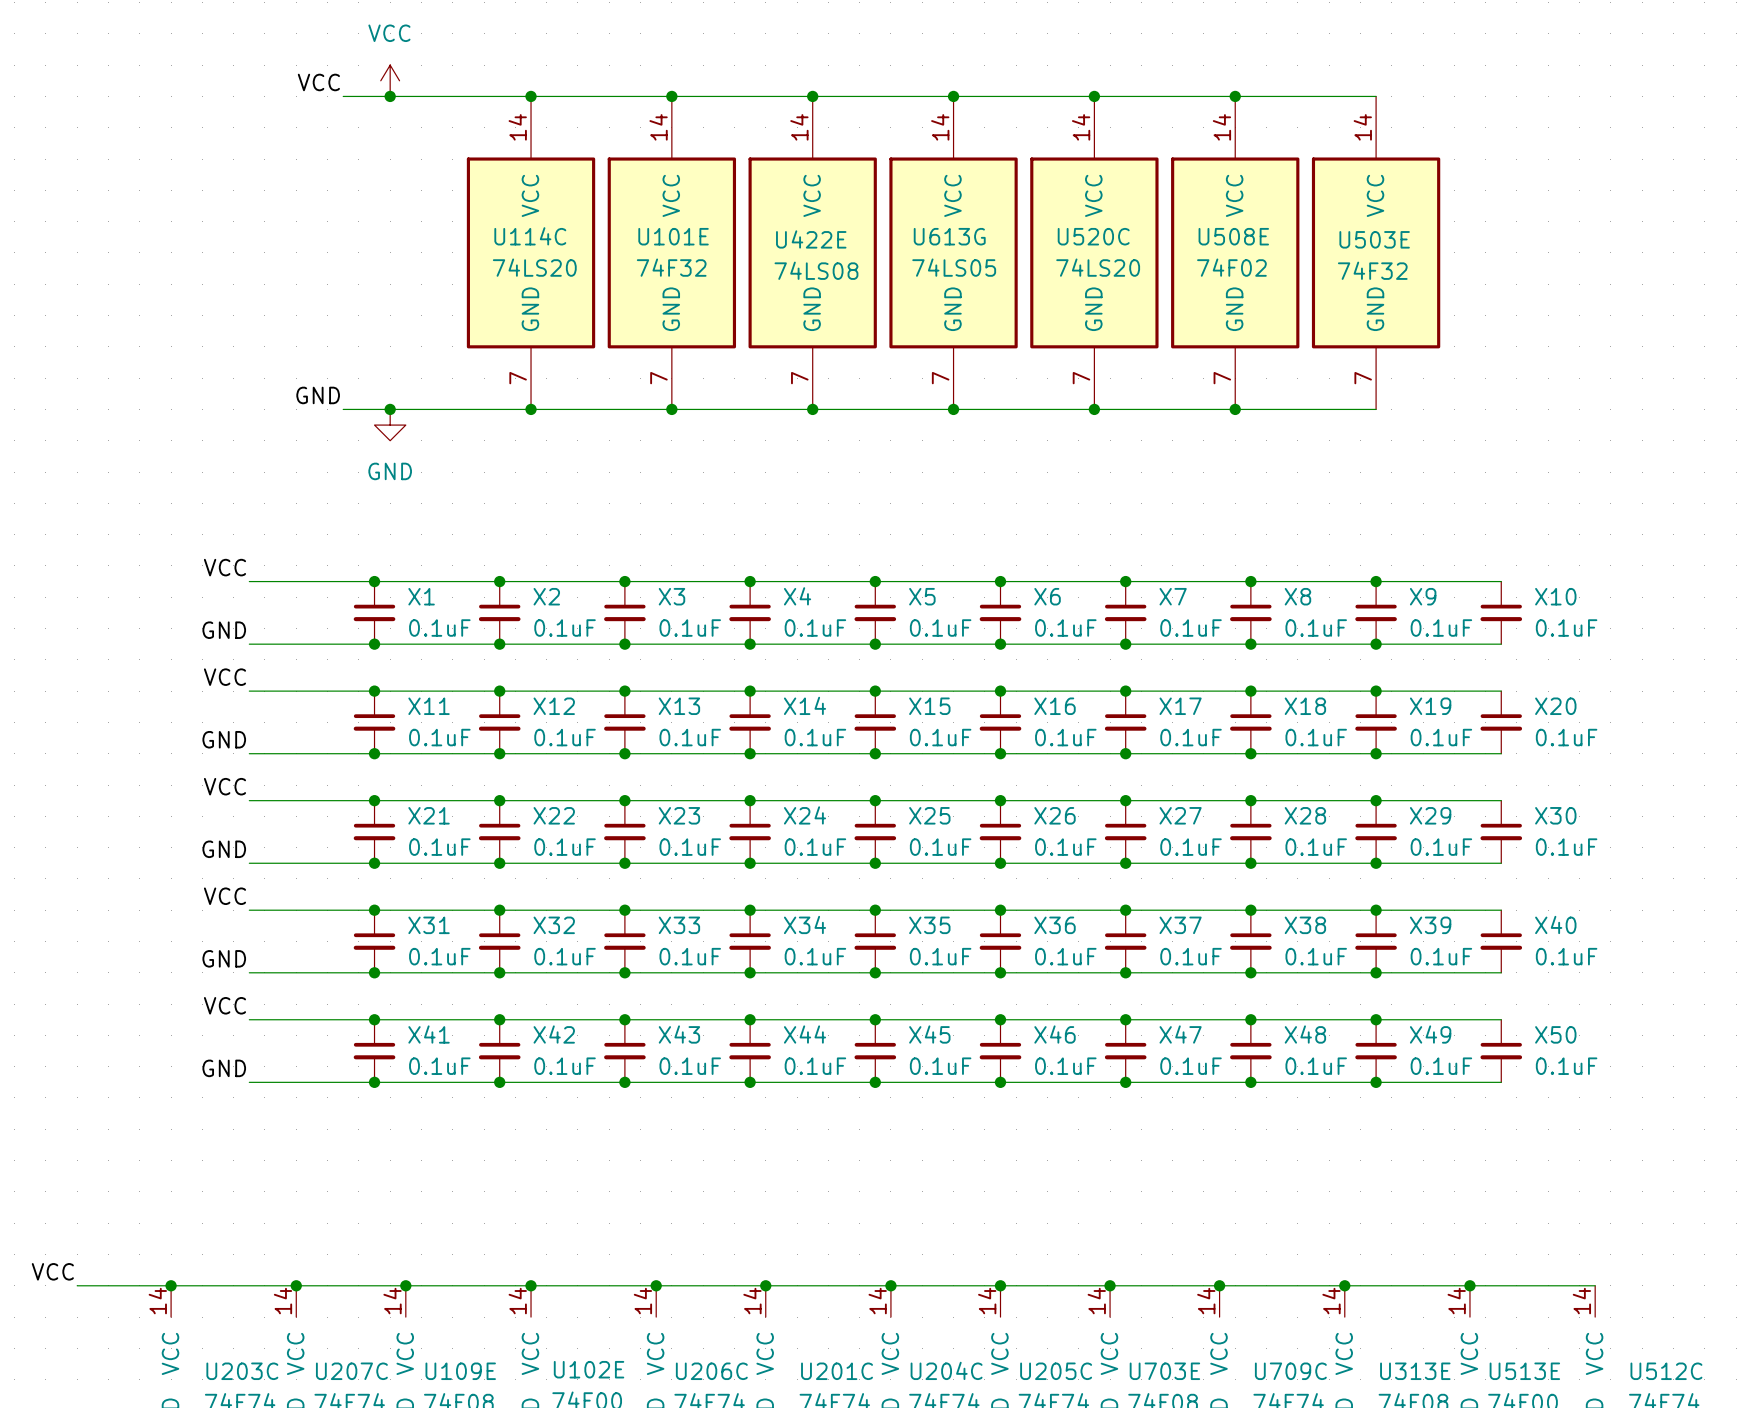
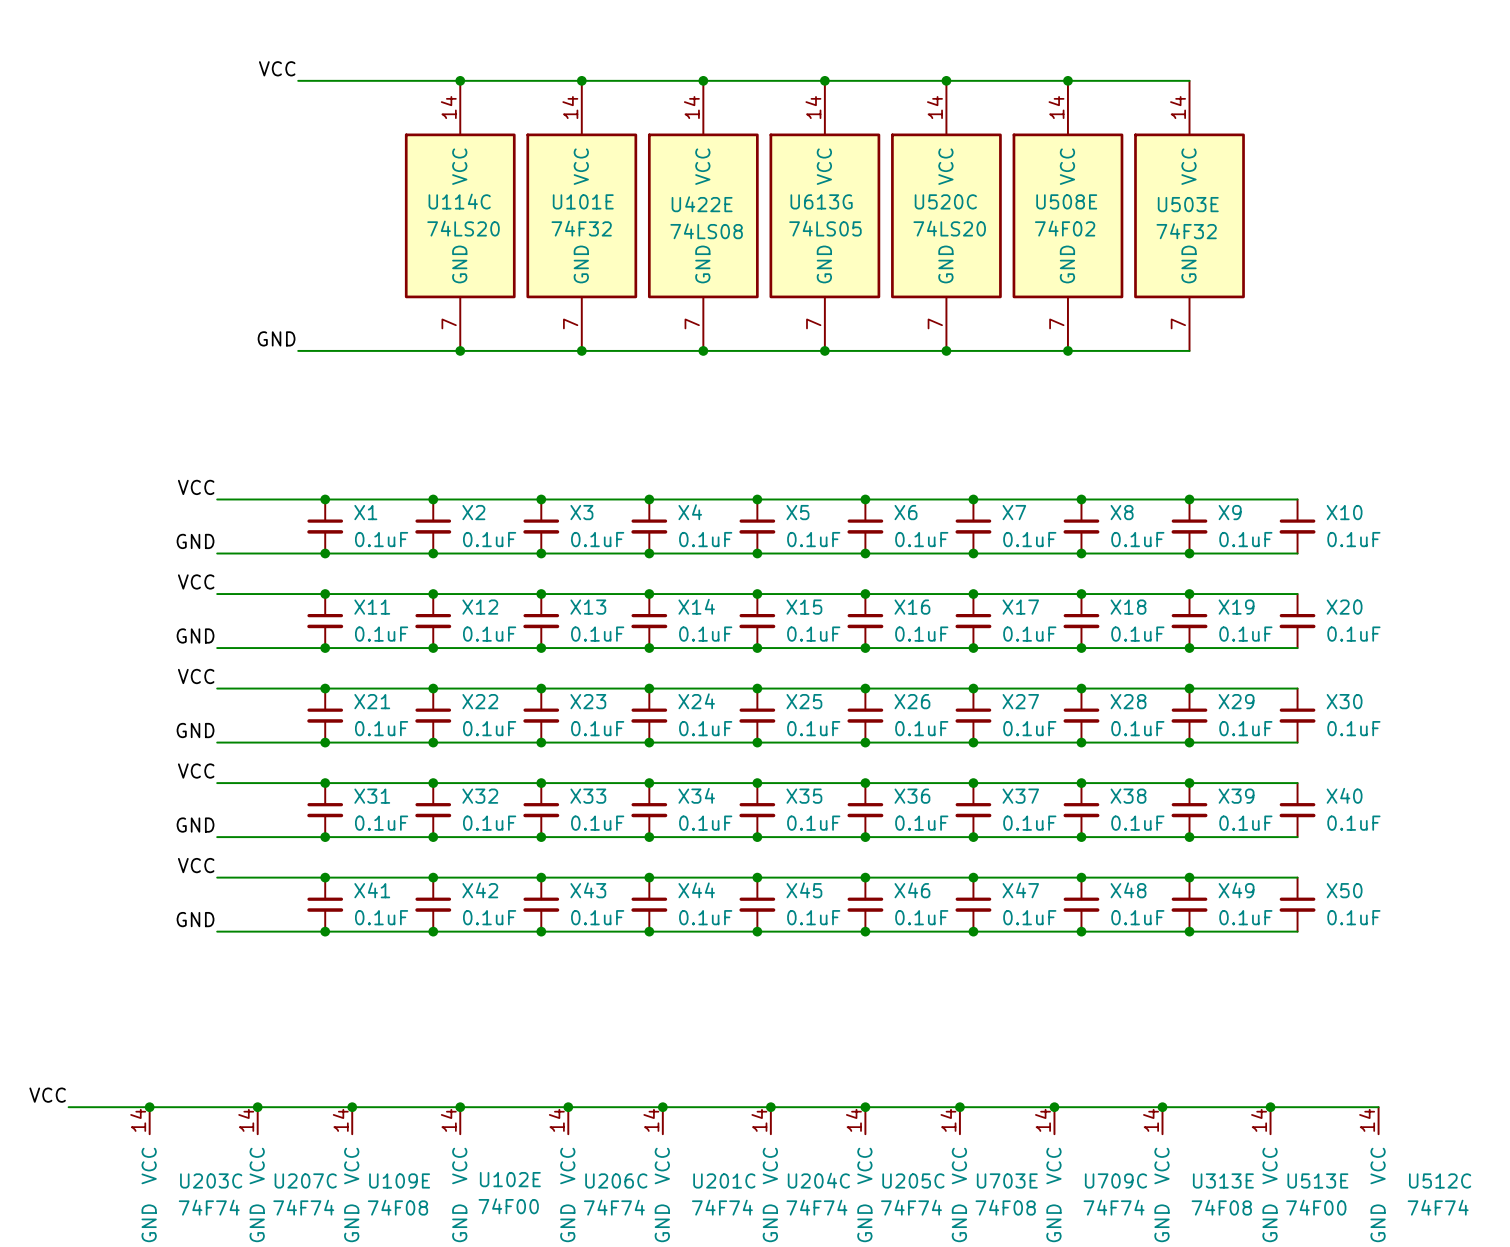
power symbol: VCC (390, 80) -> none
junction: (390, 96) -> none
junction: (390, 409) -> none
power symbol: GND (390, 425) -> none

